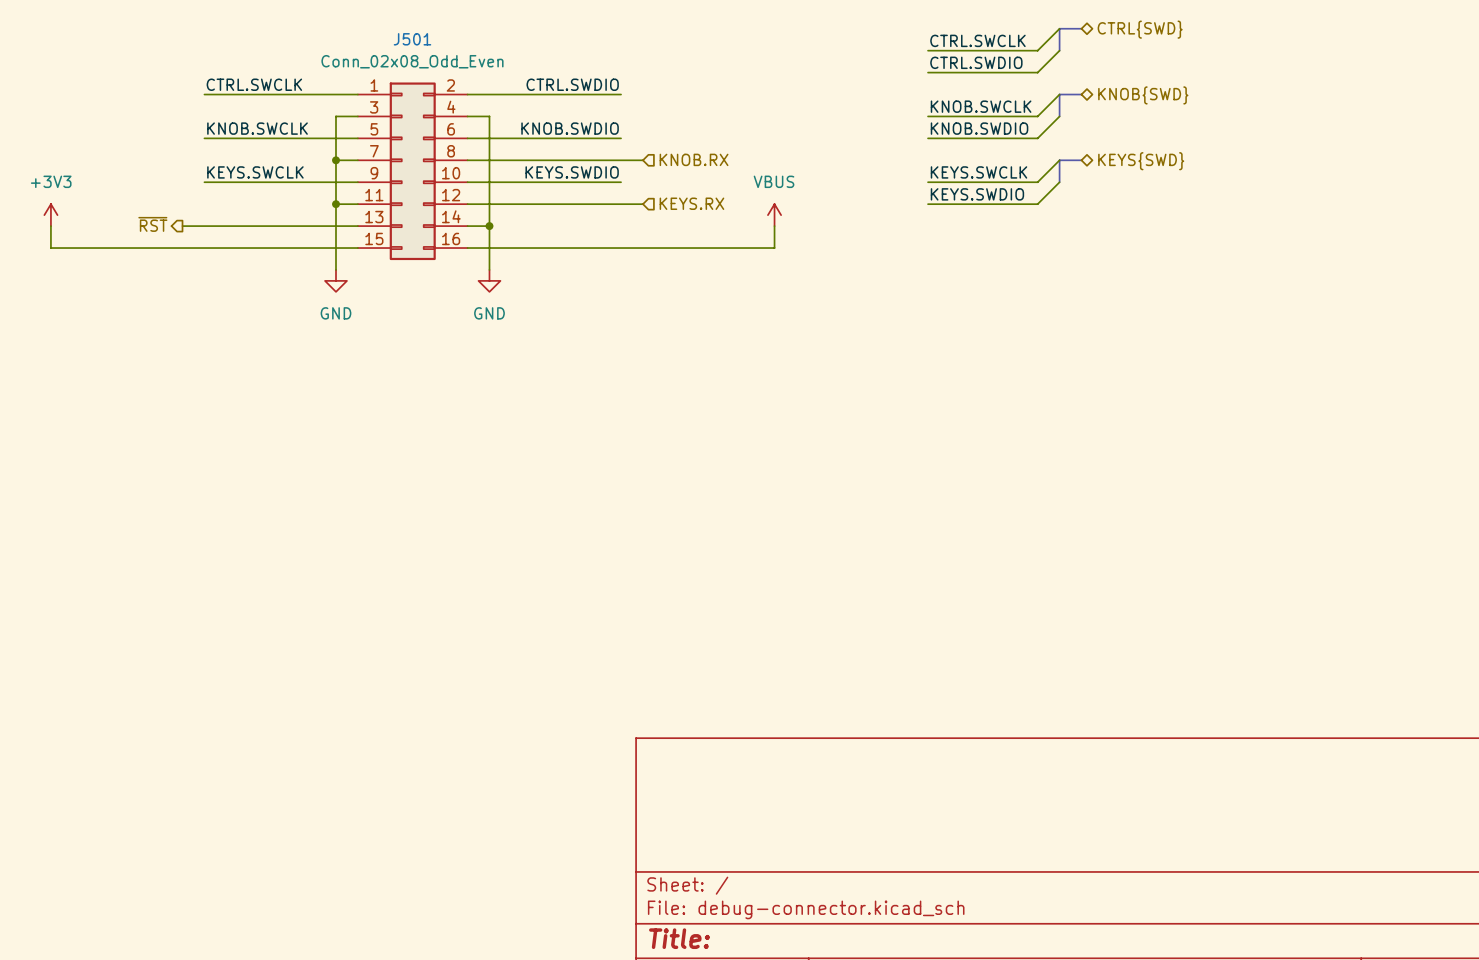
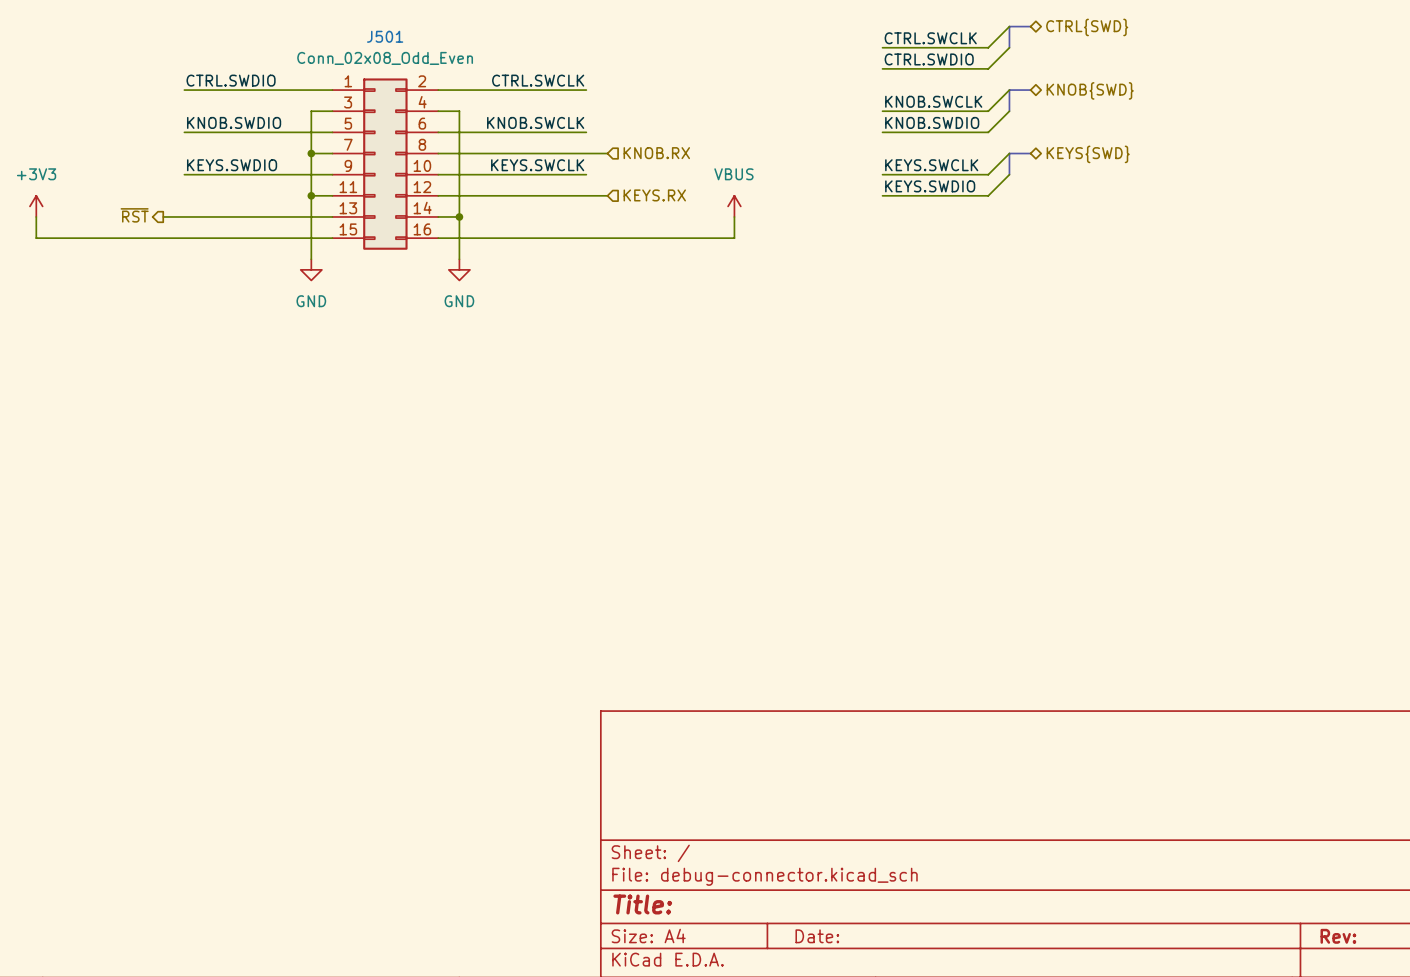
label: CTRL.SWCLK (254, 84) -> CTRL.SWDIO (231, 80)
label: CTRL.SWDIO (572, 84) -> CTRL.SWCLK (538, 80)
label: KNOB.SWCLK (257, 128) -> KNOB.SWDIO (234, 122)
label: KNOB.SWDIO (570, 128) -> KNOB.SWCLK (535, 122)
label: KEYS.SWCLK (255, 172) -> KEYS.SWDIO (232, 165)
label: KEYS.SWDIO (572, 172) -> KEYS.SWCLK (537, 165)

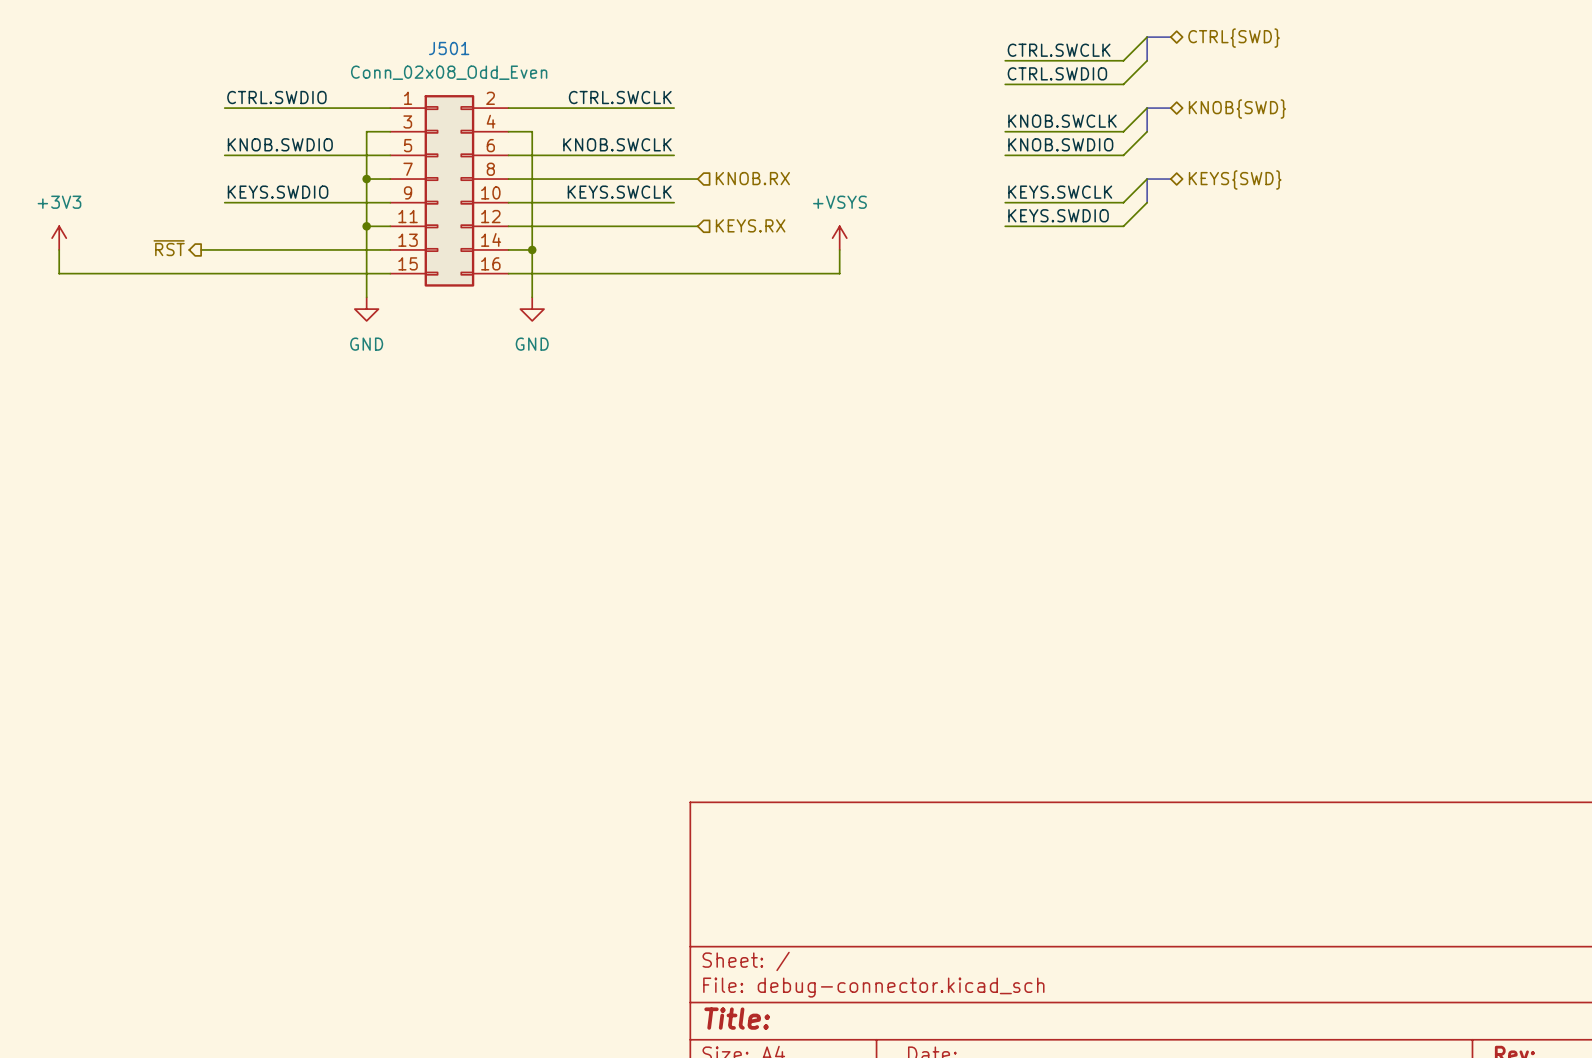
power symbol: VBUS (734, 206) -> +VSYS (839, 238)

